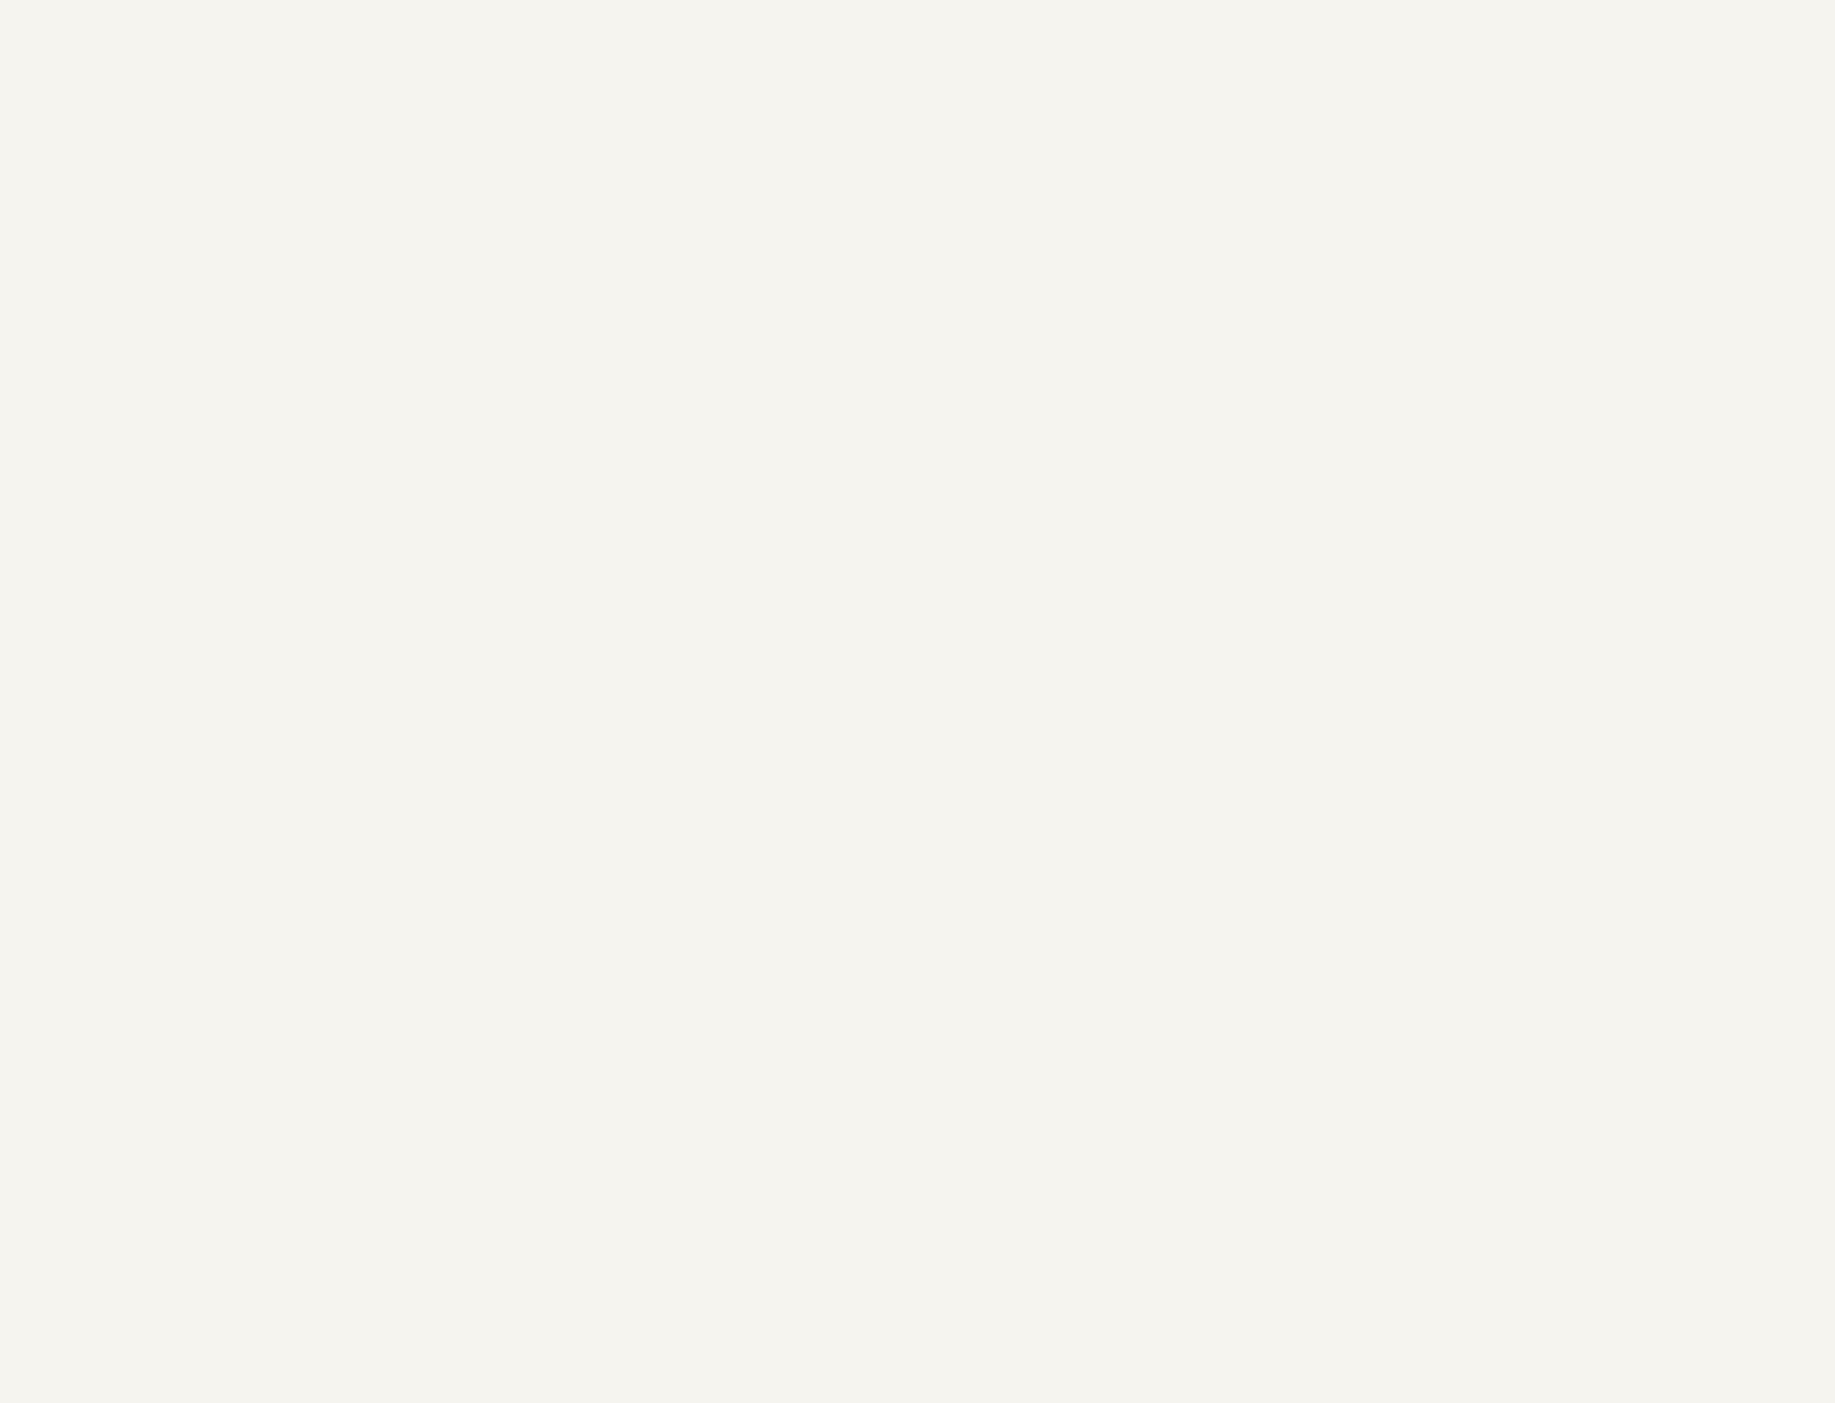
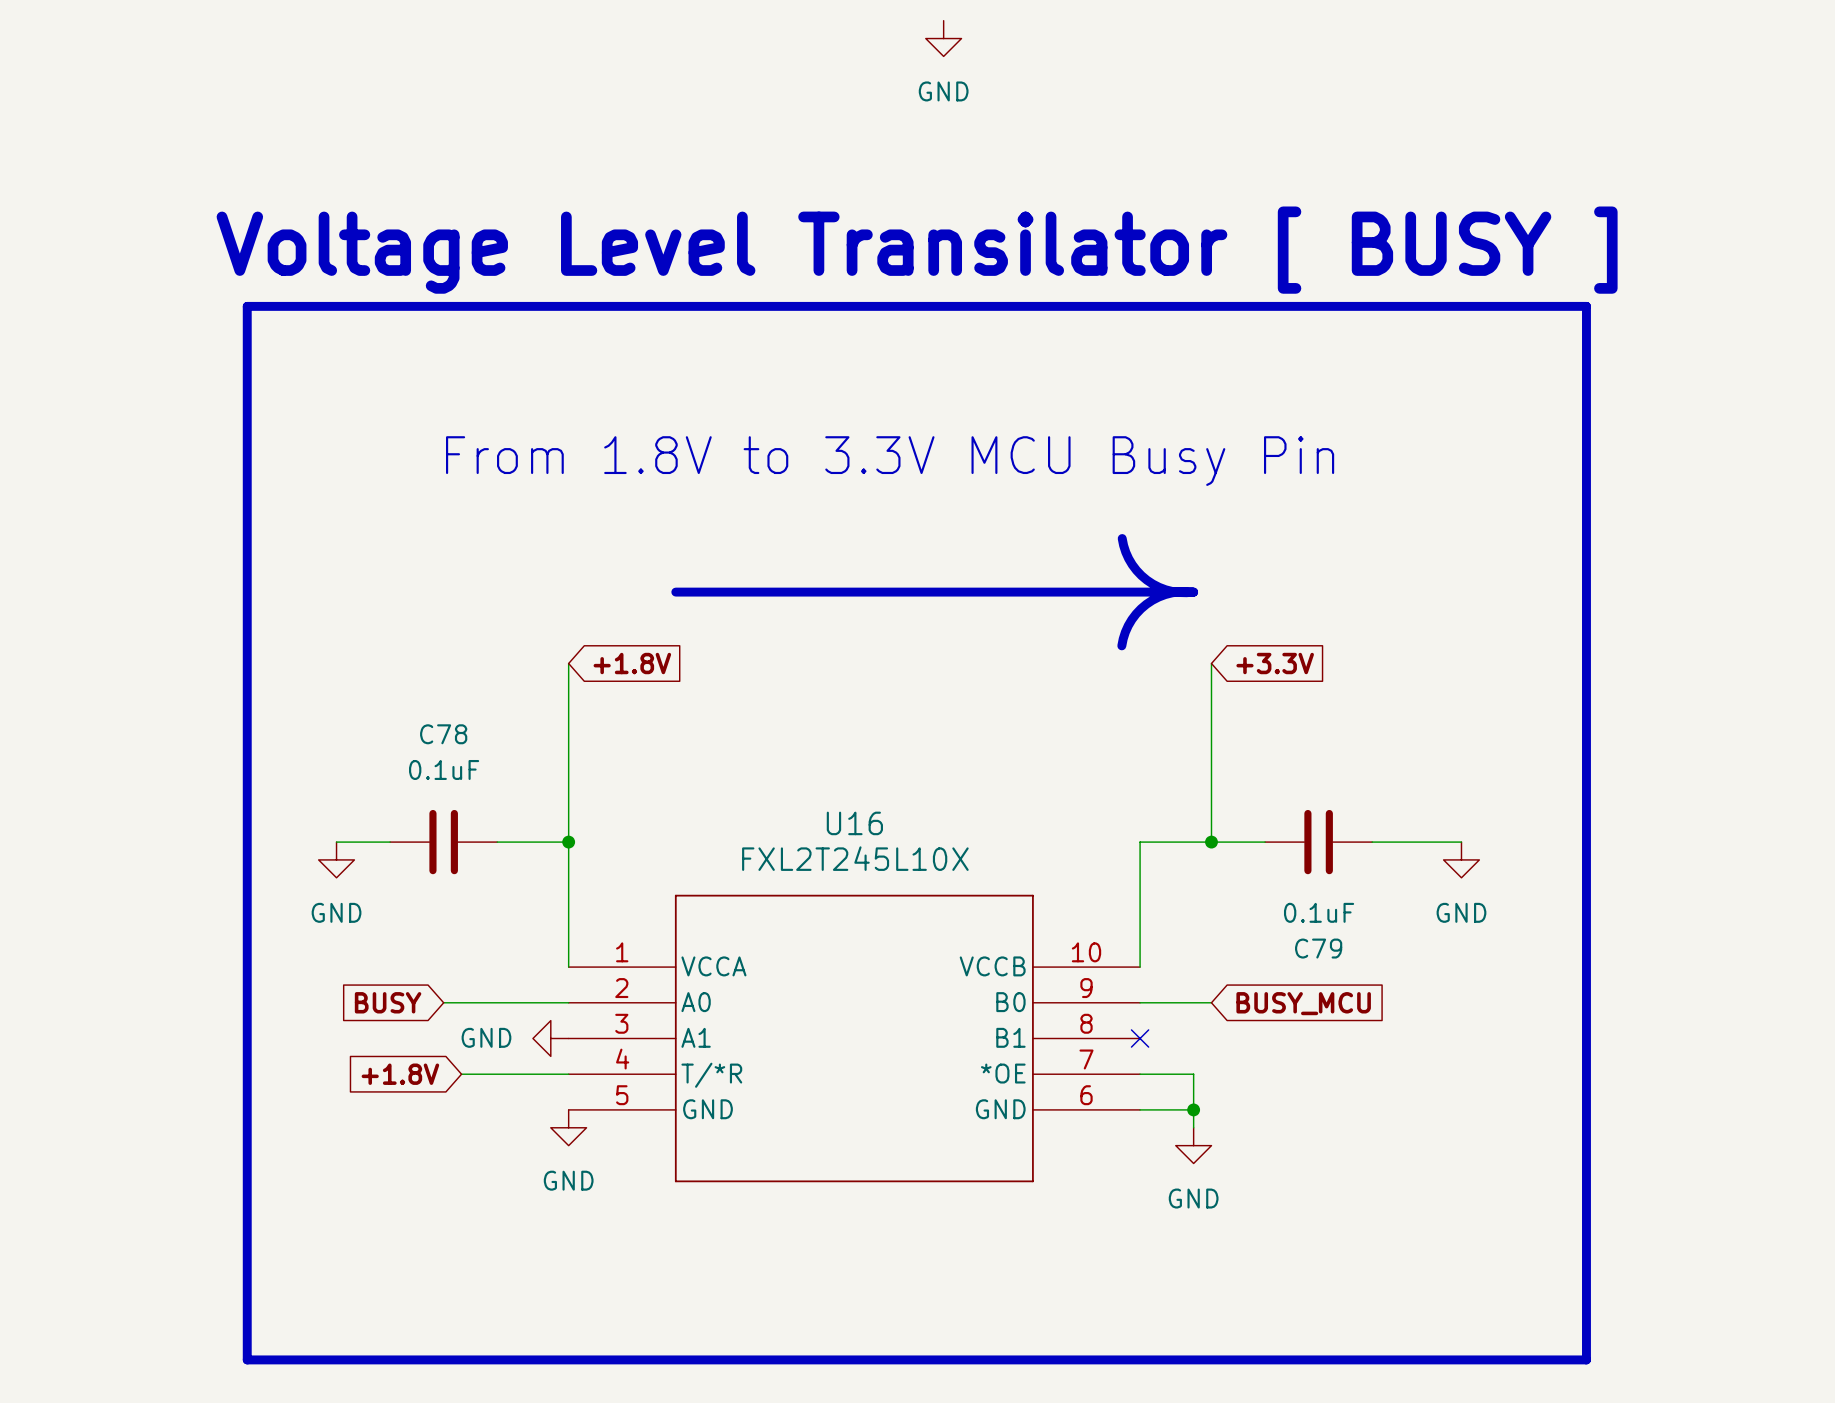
power symbol: none -> GND (943, 38)
text: none -> Voltage Level Transilator [ BUSY ] (917, 250)
line: none -> (247, 306) (1586, 306) (1586, 1359) (247, 1359) (247, 306)
text: none -> From 1.8V to 3.3V MCU Busy Pin (890, 461)
line: none -> (1122, 538) (1128, 558) (1136, 570) (1146, 580) (1159, 587) (1172, 591) (1193, 592) (675, 592)
line: none -> (1193, 592) (1172, 592) (1158, 597) (1146, 604) (1131, 619) (1125, 632) (1121, 645)
wire: none -> (568, 663) (568, 967)
global label: none -> +1.8V (632, 663)
wire: none -> (1211, 663) (1211, 842)
global label: none -> +3.3V (1275, 663)
wire: none -> (336, 842) (390, 842)
C78: none -> 0.1uF (443, 842)
wire: none -> (497, 842) (568, 842)
junction: none -> (568, 842)
junction: none -> (1211, 842)
wire: none -> (1265, 842) (1140, 842) (1140, 967)
C79: none -> 0.1uF (1318, 842)
wire: none -> (1372, 842) (1461, 842)
power symbol: none -> GND (336, 859)
power symbol: none -> GND (1461, 859)
global label: none -> BUSY (388, 1002)
wire: none -> (443, 1002) (568, 1002)
wire: none -> (1140, 1002) (1211, 1002)
global label: none -> BUSY_MCU (1303, 1003)
power symbol: none -> GND (550, 1038)
U16: none -> FXL2T245L10X (854, 1038)
no-connect mark: none -> (1140, 1038)
global label: none -> +1.8V (400, 1074)
wire: none -> (461, 1074) (568, 1074)
wire: none -> (1140, 1074) (1193, 1074) (1193, 1127)
wire: none -> (1140, 1109) (1193, 1109)
junction: none -> (1193, 1109)
power symbol: none -> GND (568, 1127)
power symbol: none -> GND (1193, 1145)

